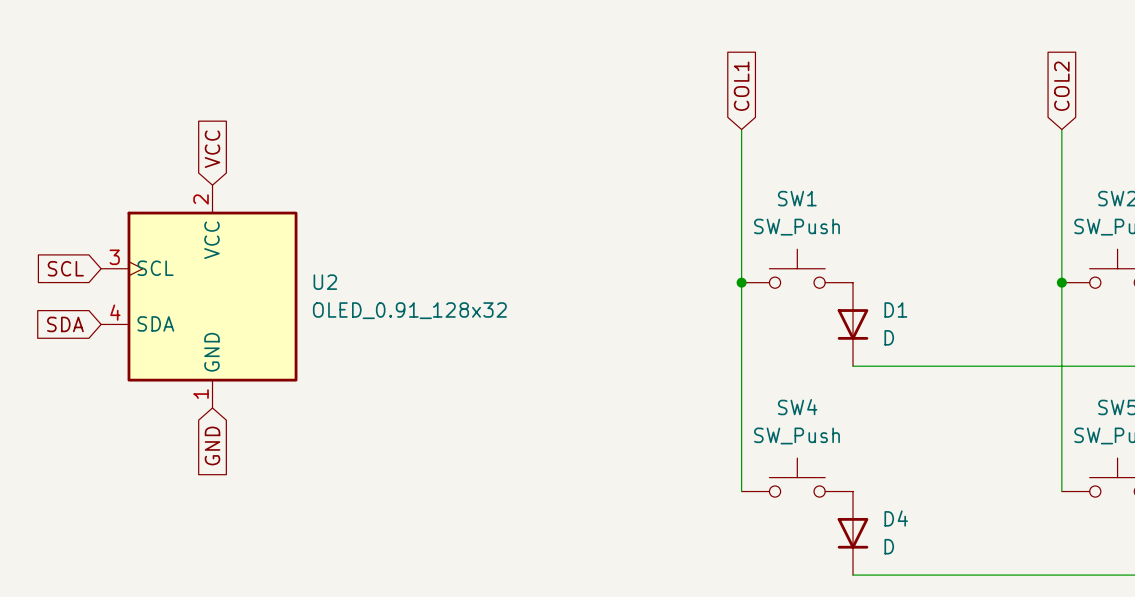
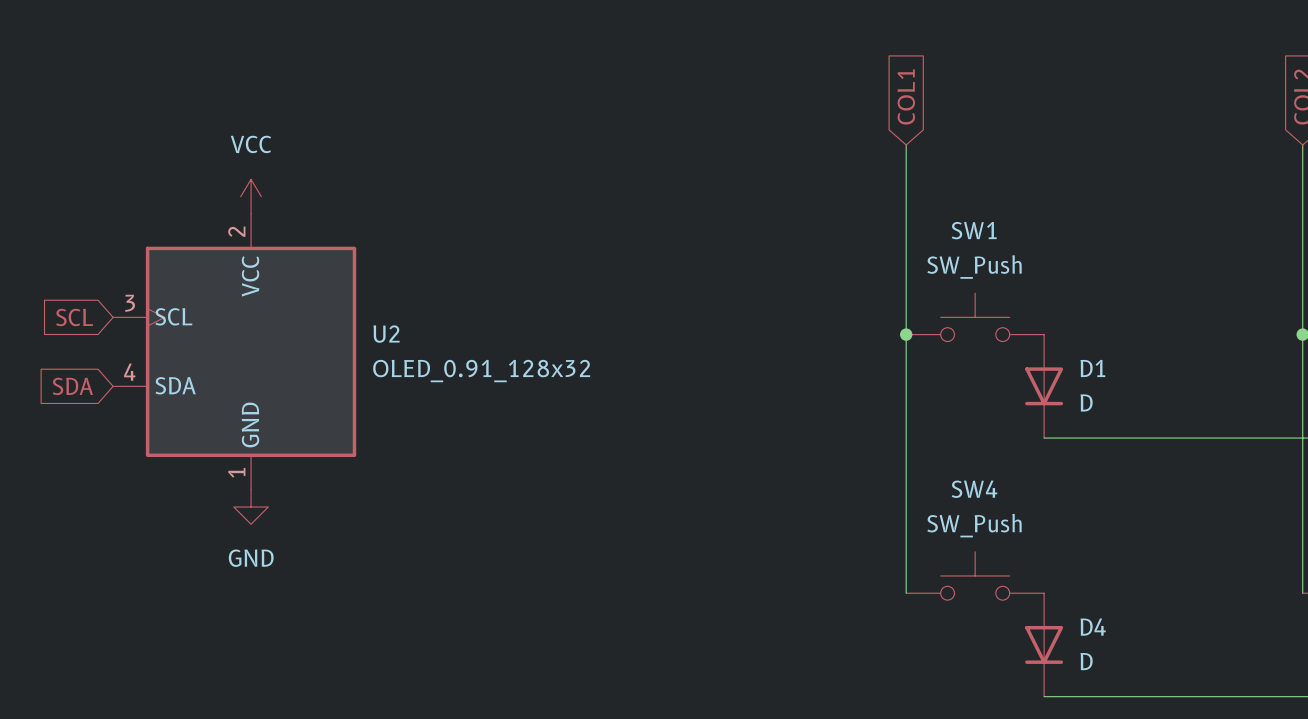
global label: VCC (212, 149) -> none
power symbol: none -> VCC (251, 196)
power symbol: none -> GND (251, 507)
global label: GND (212, 445) -> none

